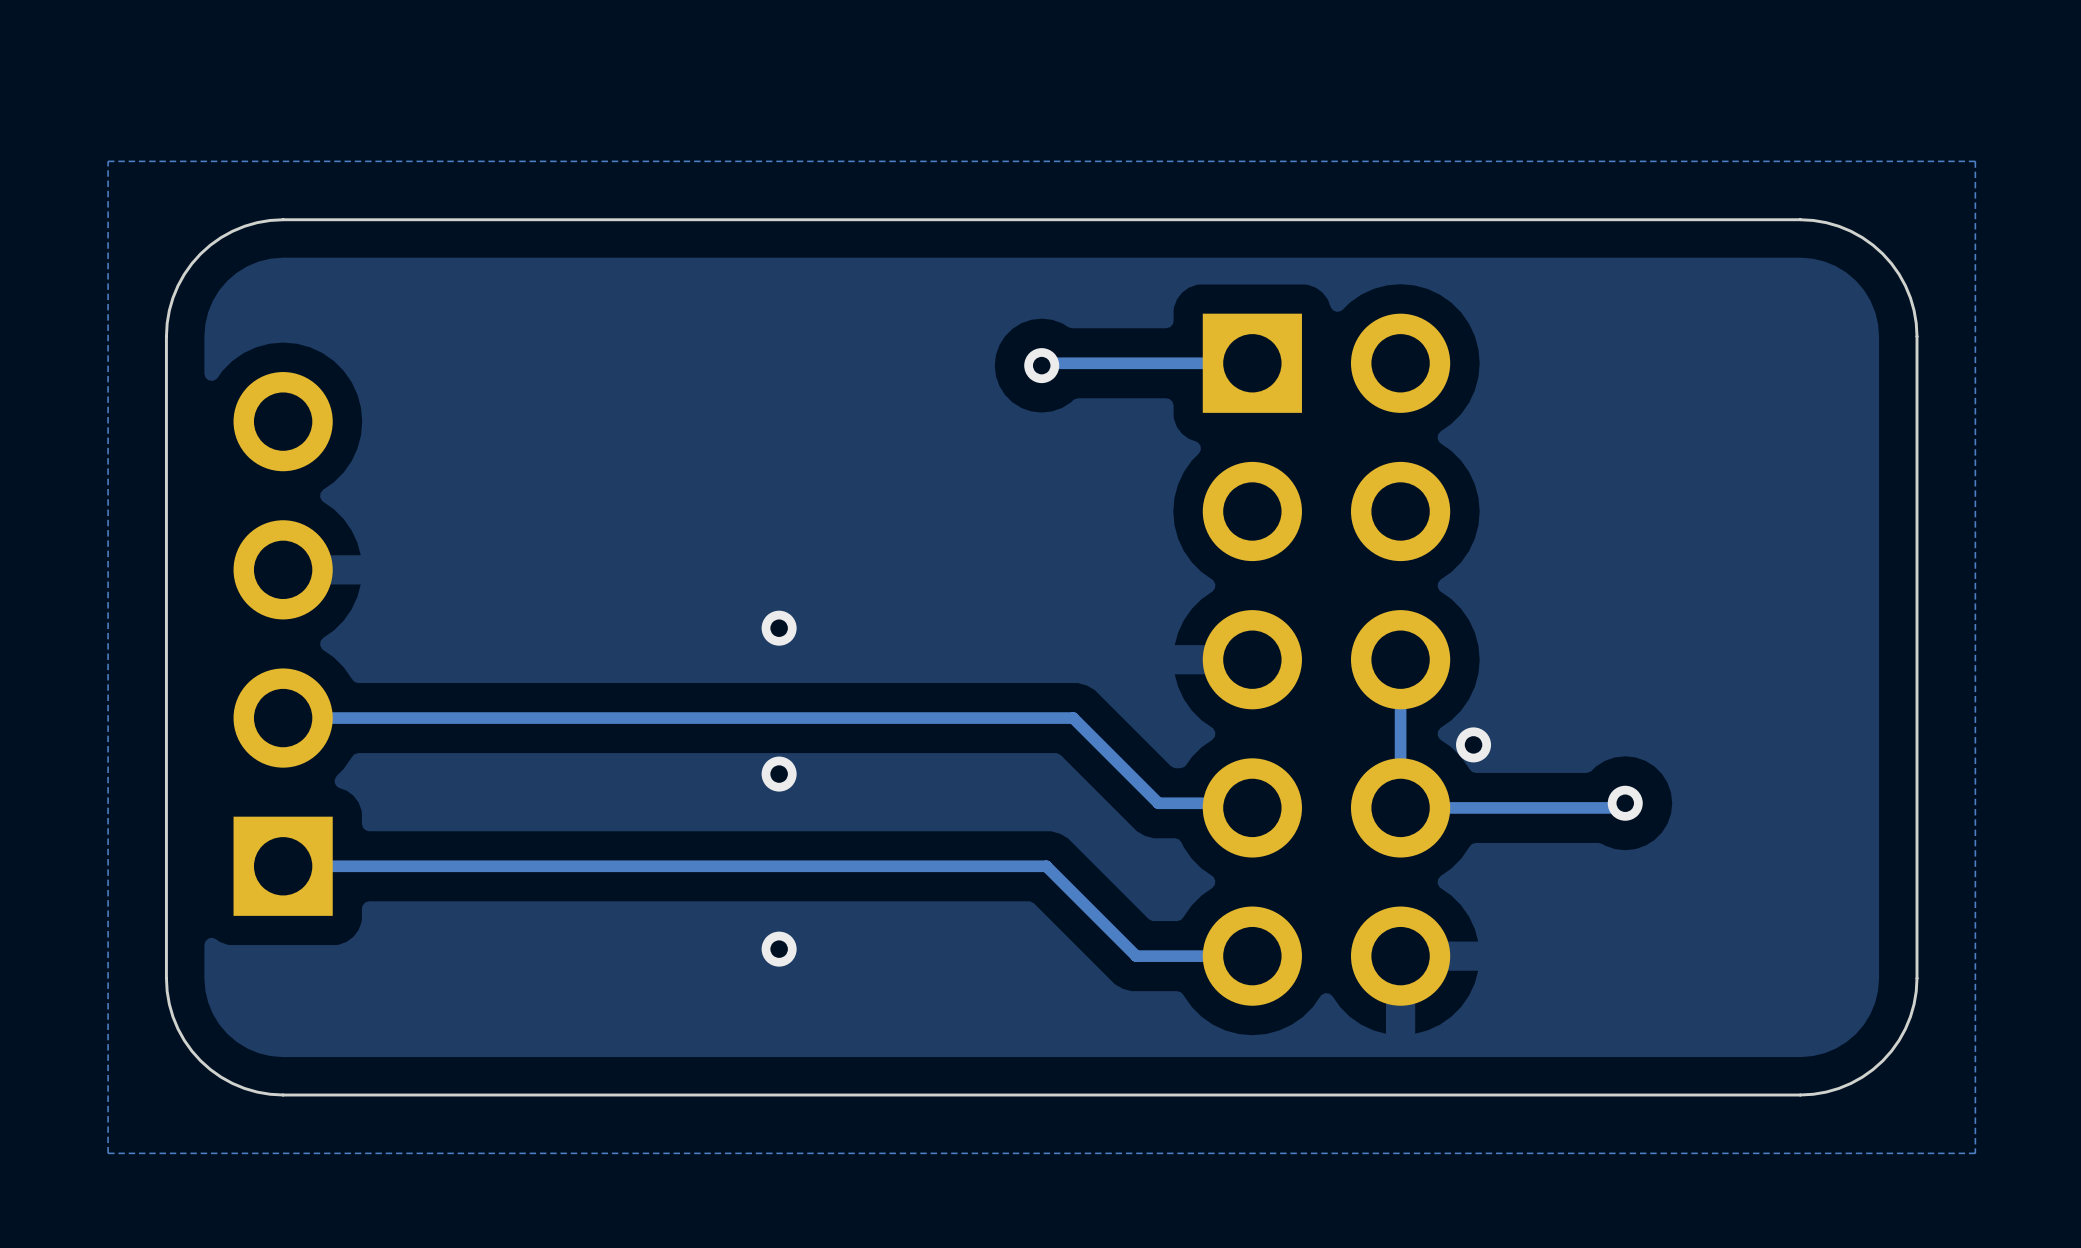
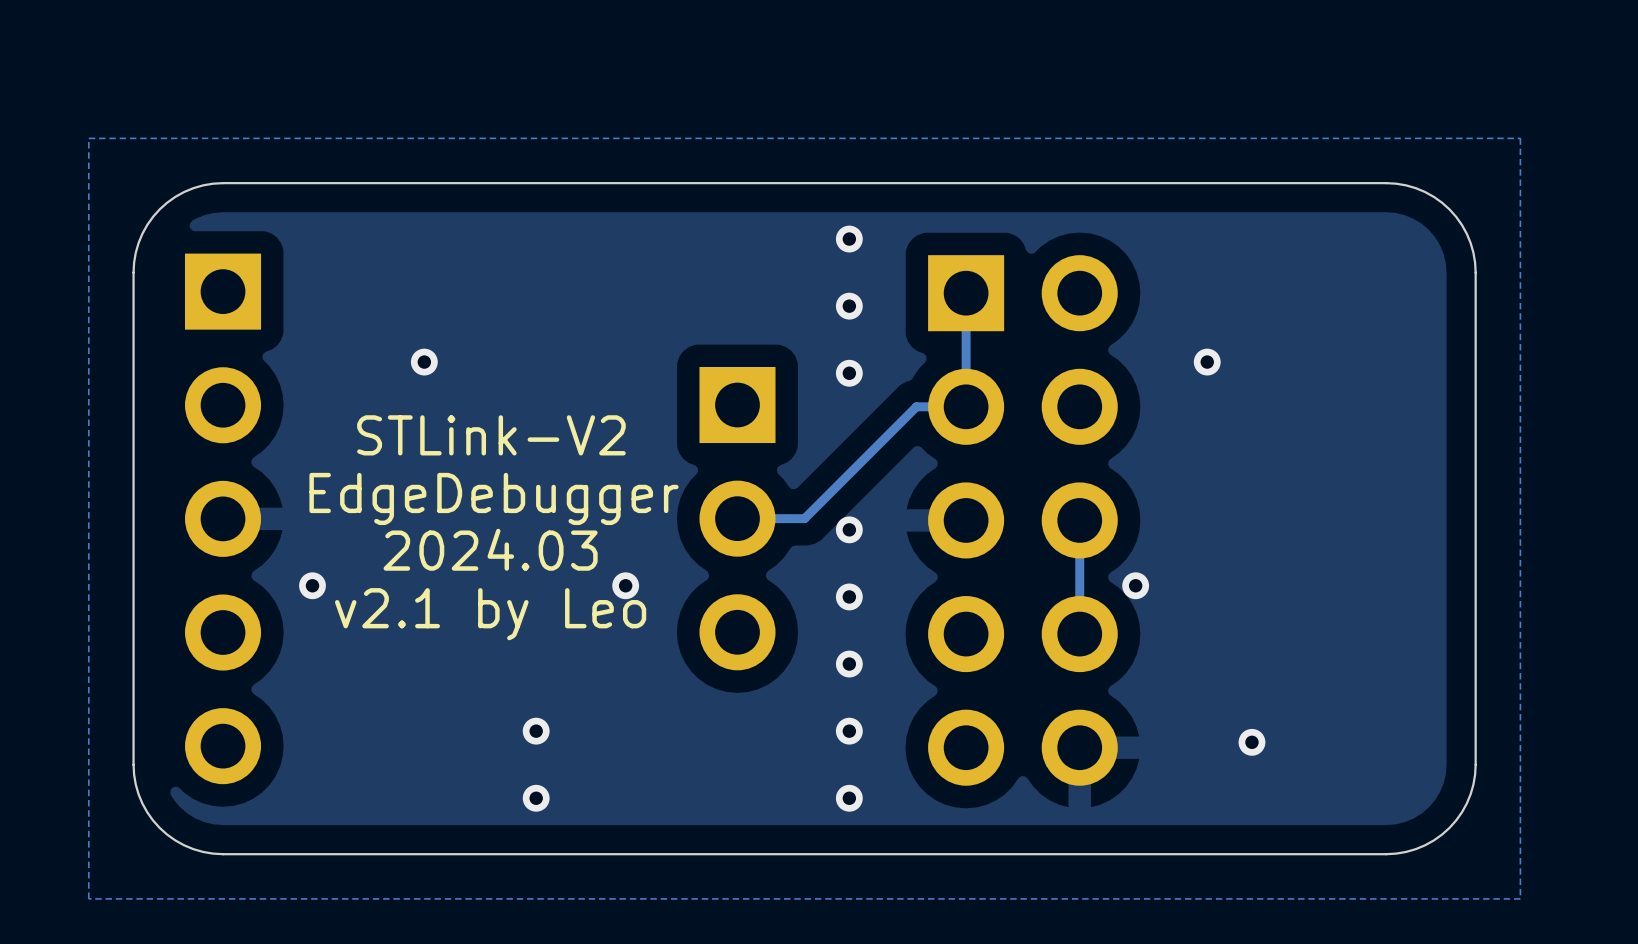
via: none -> (849, 239)
track: (1252, 363) (1044, 363) (1041, 365) -> (966, 293) (966, 406) (916, 406) (804, 518) (737, 518)
via: (1041, 365) -> none
part footprint: [233, 372, 333, 916] -> [185, 253, 262, 785]
via: none -> (849, 306)
via: none -> (424, 362)
via: none -> (1207, 362)
via: none -> (849, 373)
text: none -> STLink-V2 (491, 435)
via: (779, 628) -> none
text: none -> EdgeDebugger (494, 498)
part: none -> (737, 518)
via: none -> (849, 529)
text: none -> 2024.03 (490, 549)
track: (283, 718) (1073, 718) (1158, 803) (1247, 803) -> none
via: none -> (312, 585)
via: none -> (849, 596)
via position: (779, 774) -> (625, 585)
text: none -> v2.1 by Leo (490, 614)
track: (1625, 803) (1620, 807) (1400, 807) -> none
via position: (1625, 803) -> (1251, 742)
via: none -> (849, 664)
track: (283, 866) (1046, 866) (1136, 956) (1252, 956) -> none
via: none -> (536, 731)
via: none -> (849, 731)
via: (779, 949) -> none
via: none -> (536, 798)
via: none -> (849, 798)

